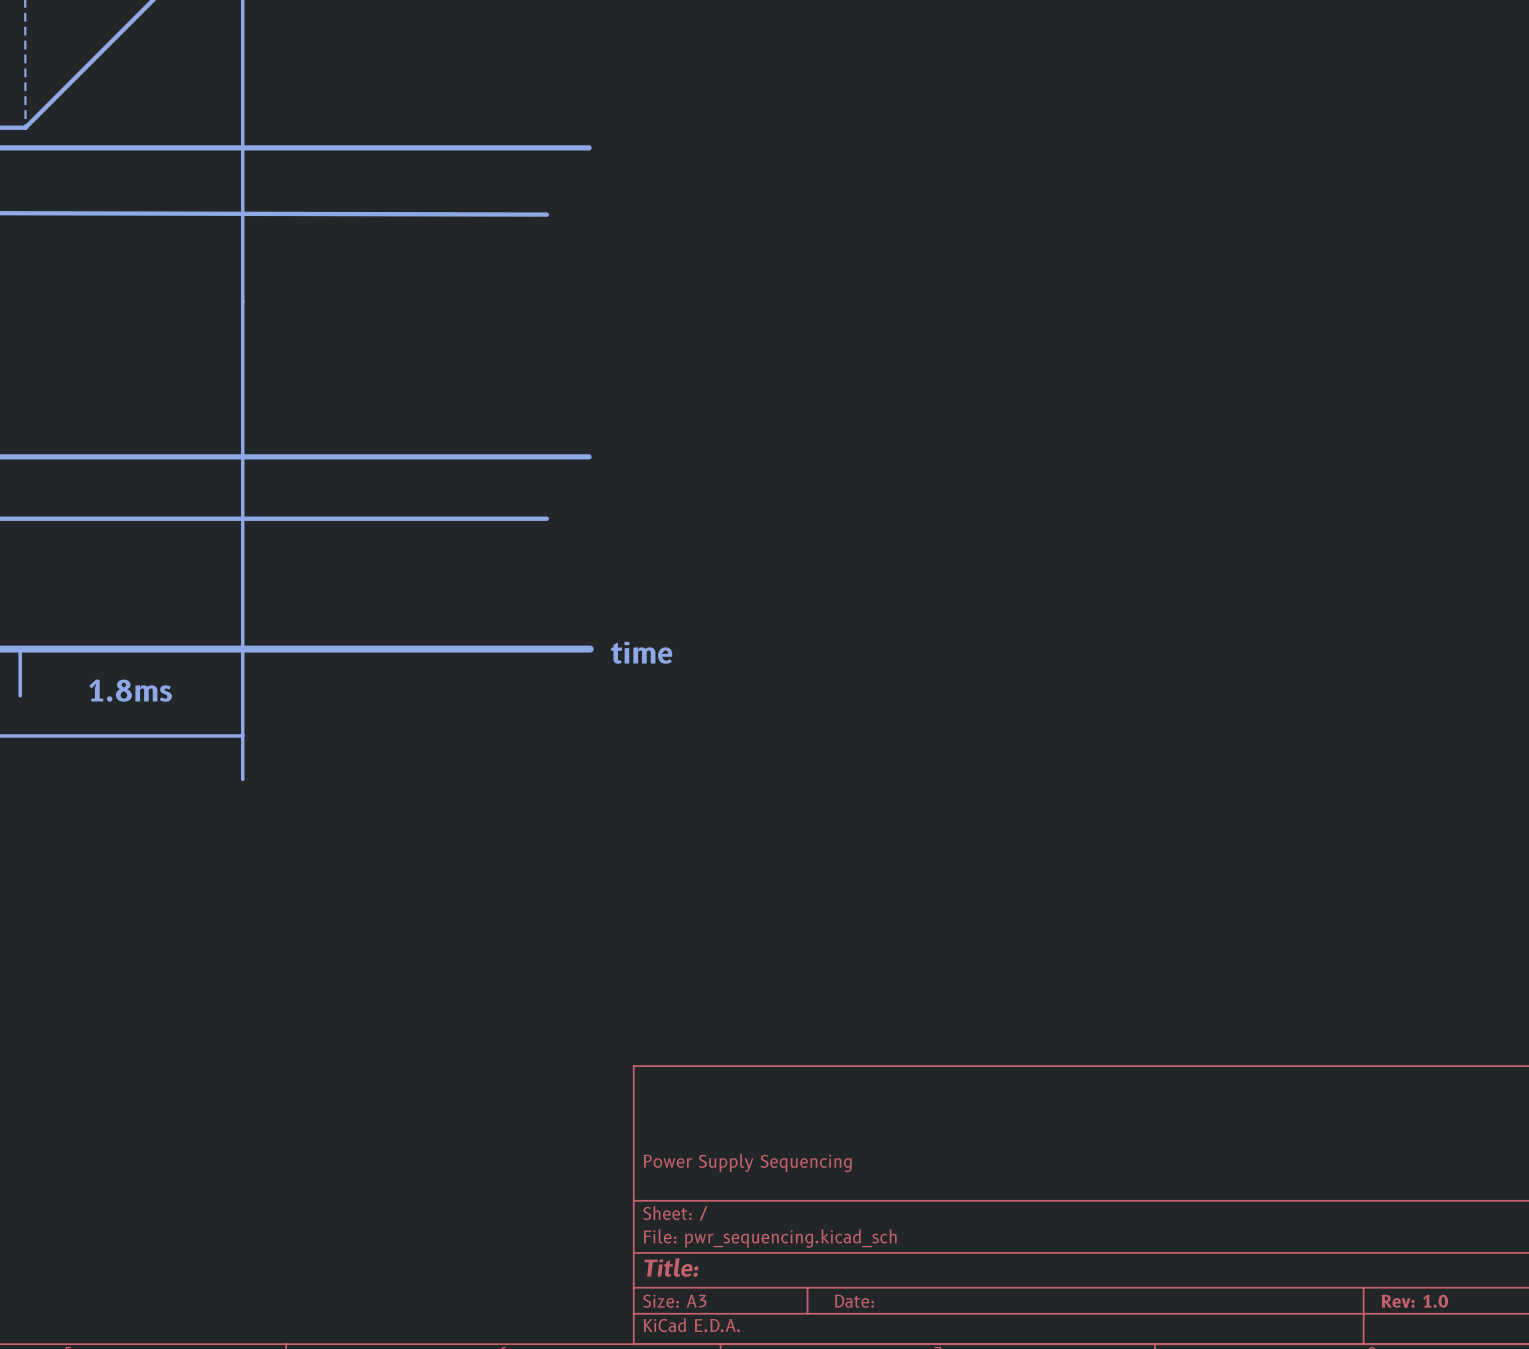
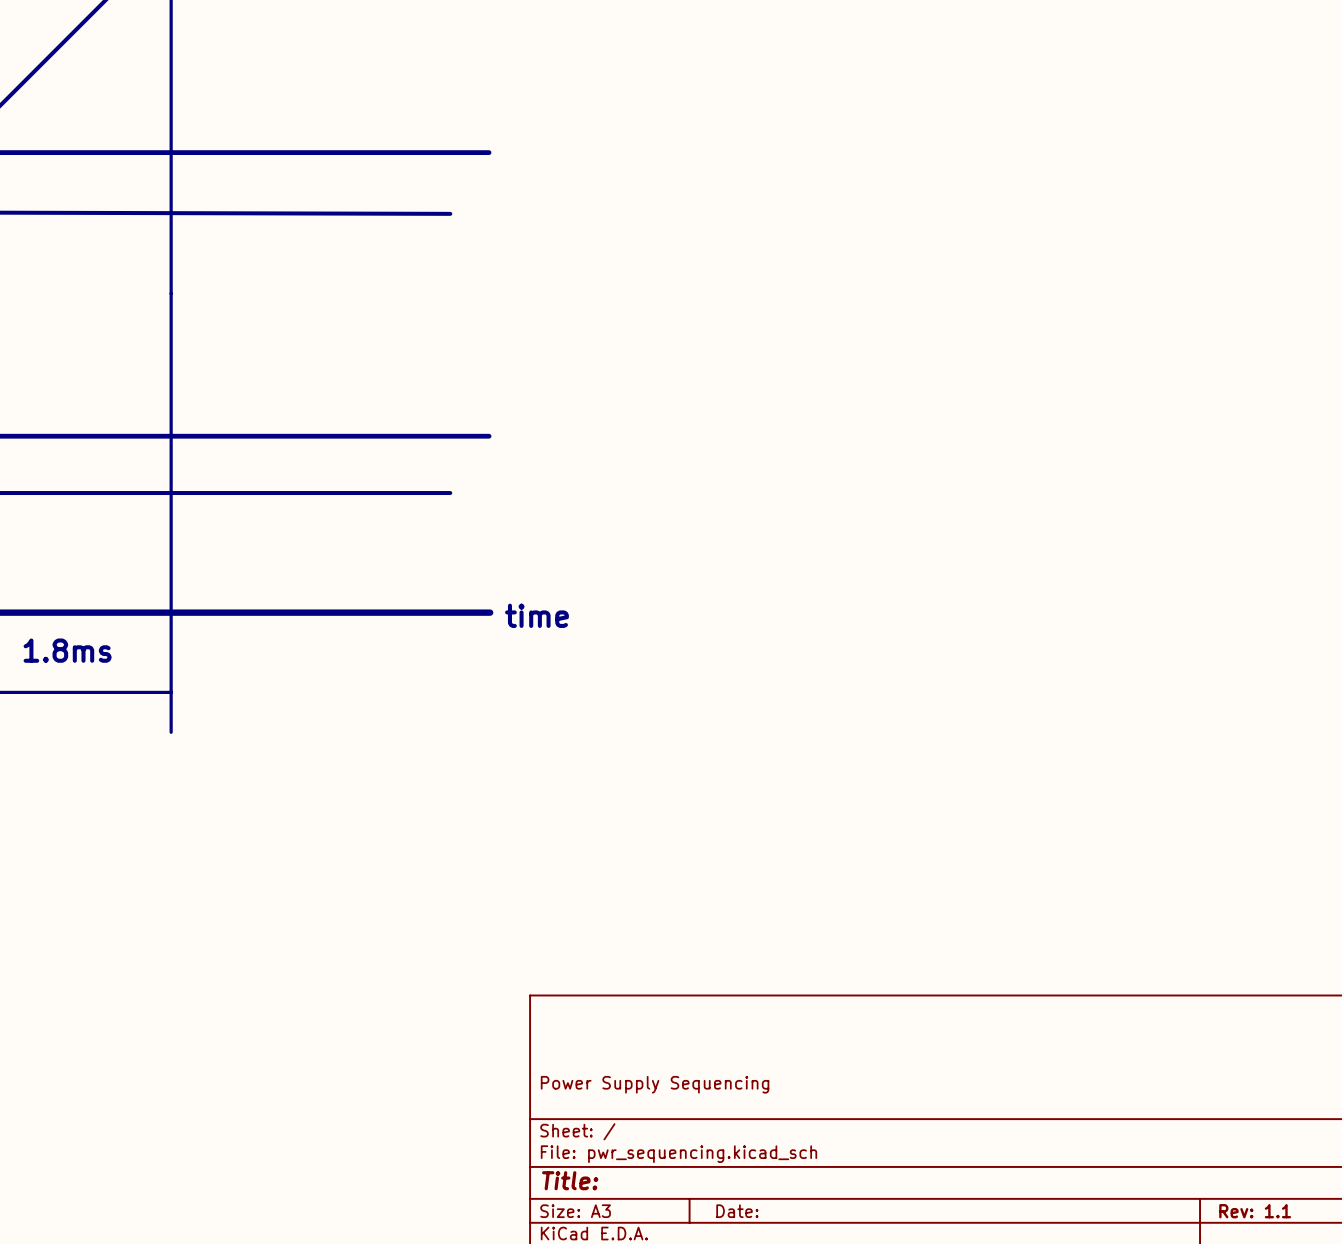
title block: Rev: 1.0 (1414, 1301) -> Rev: 1.1 (1255, 1211)

